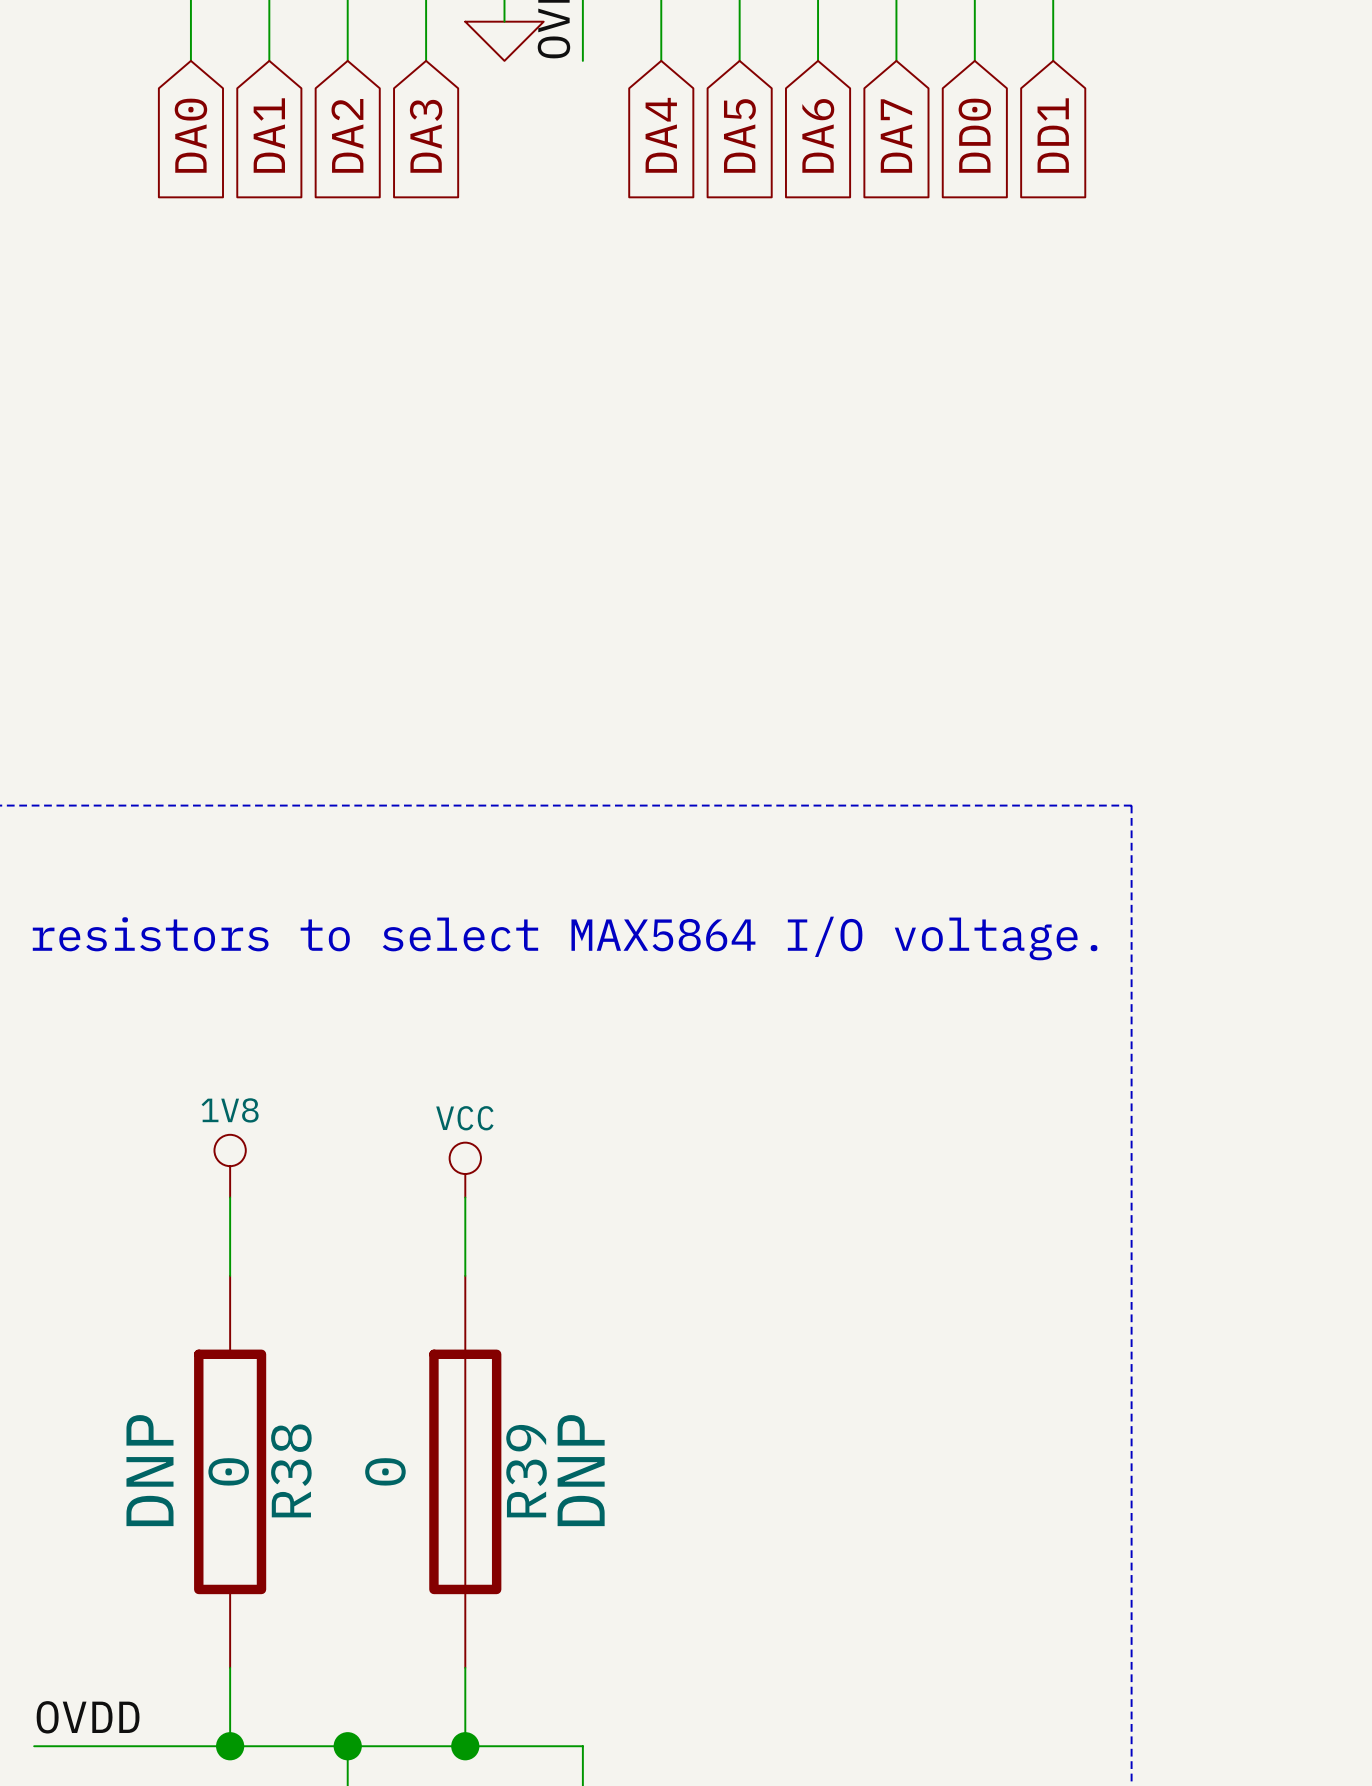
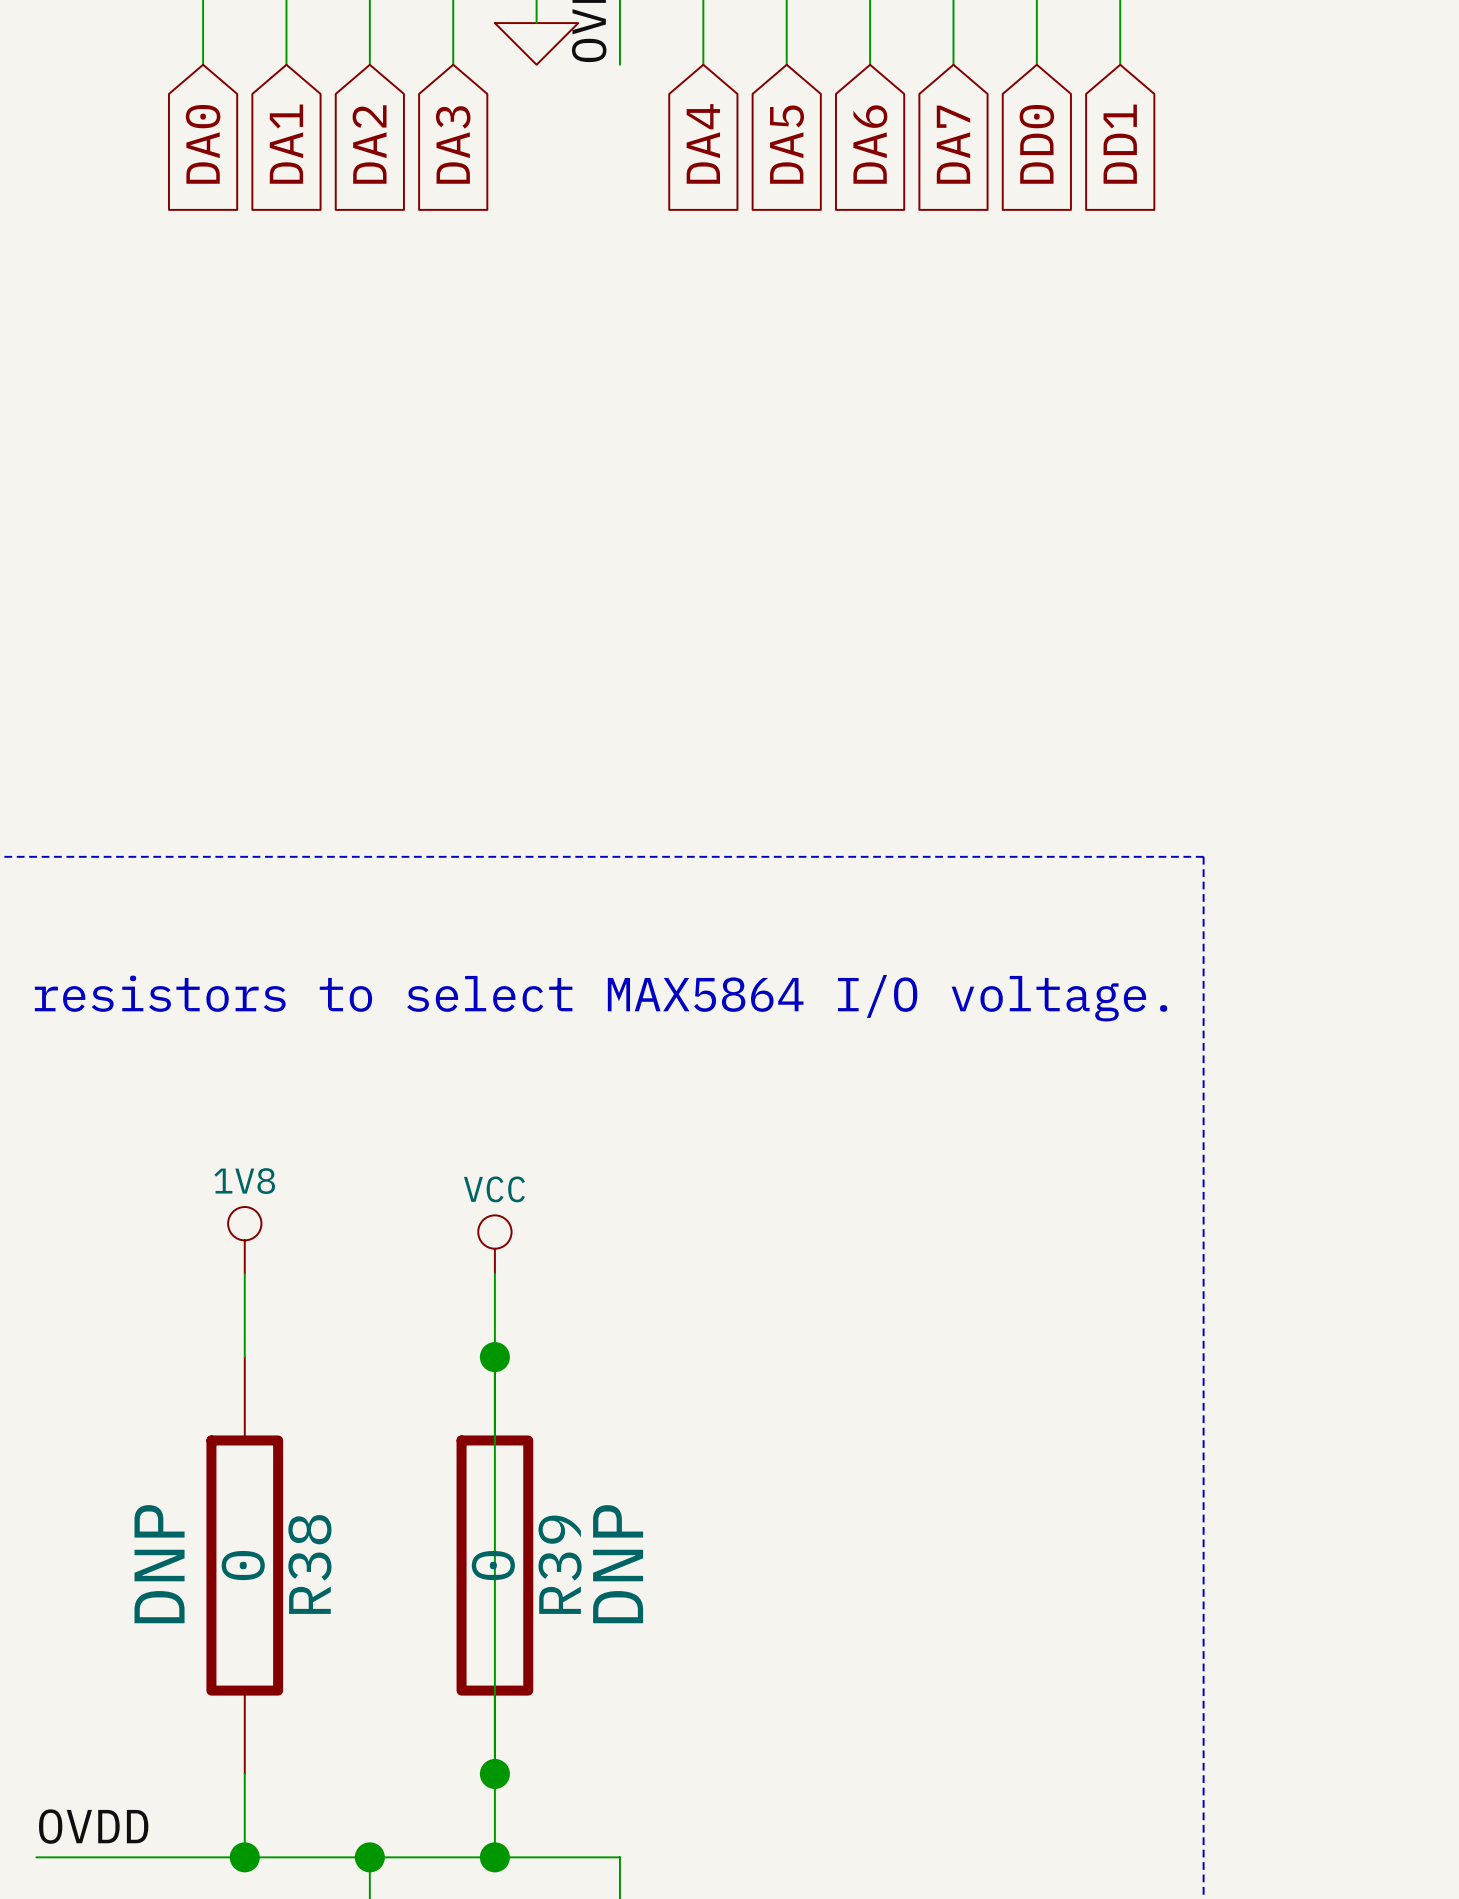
R39 symbol: [429, 1275, 502, 1668] -> [456, 1357, 534, 1774]
junction: none -> (494, 1357)
R39 value position: 0 (385, 1471) -> 0 (493, 1565)
junction: none -> (494, 1773)

